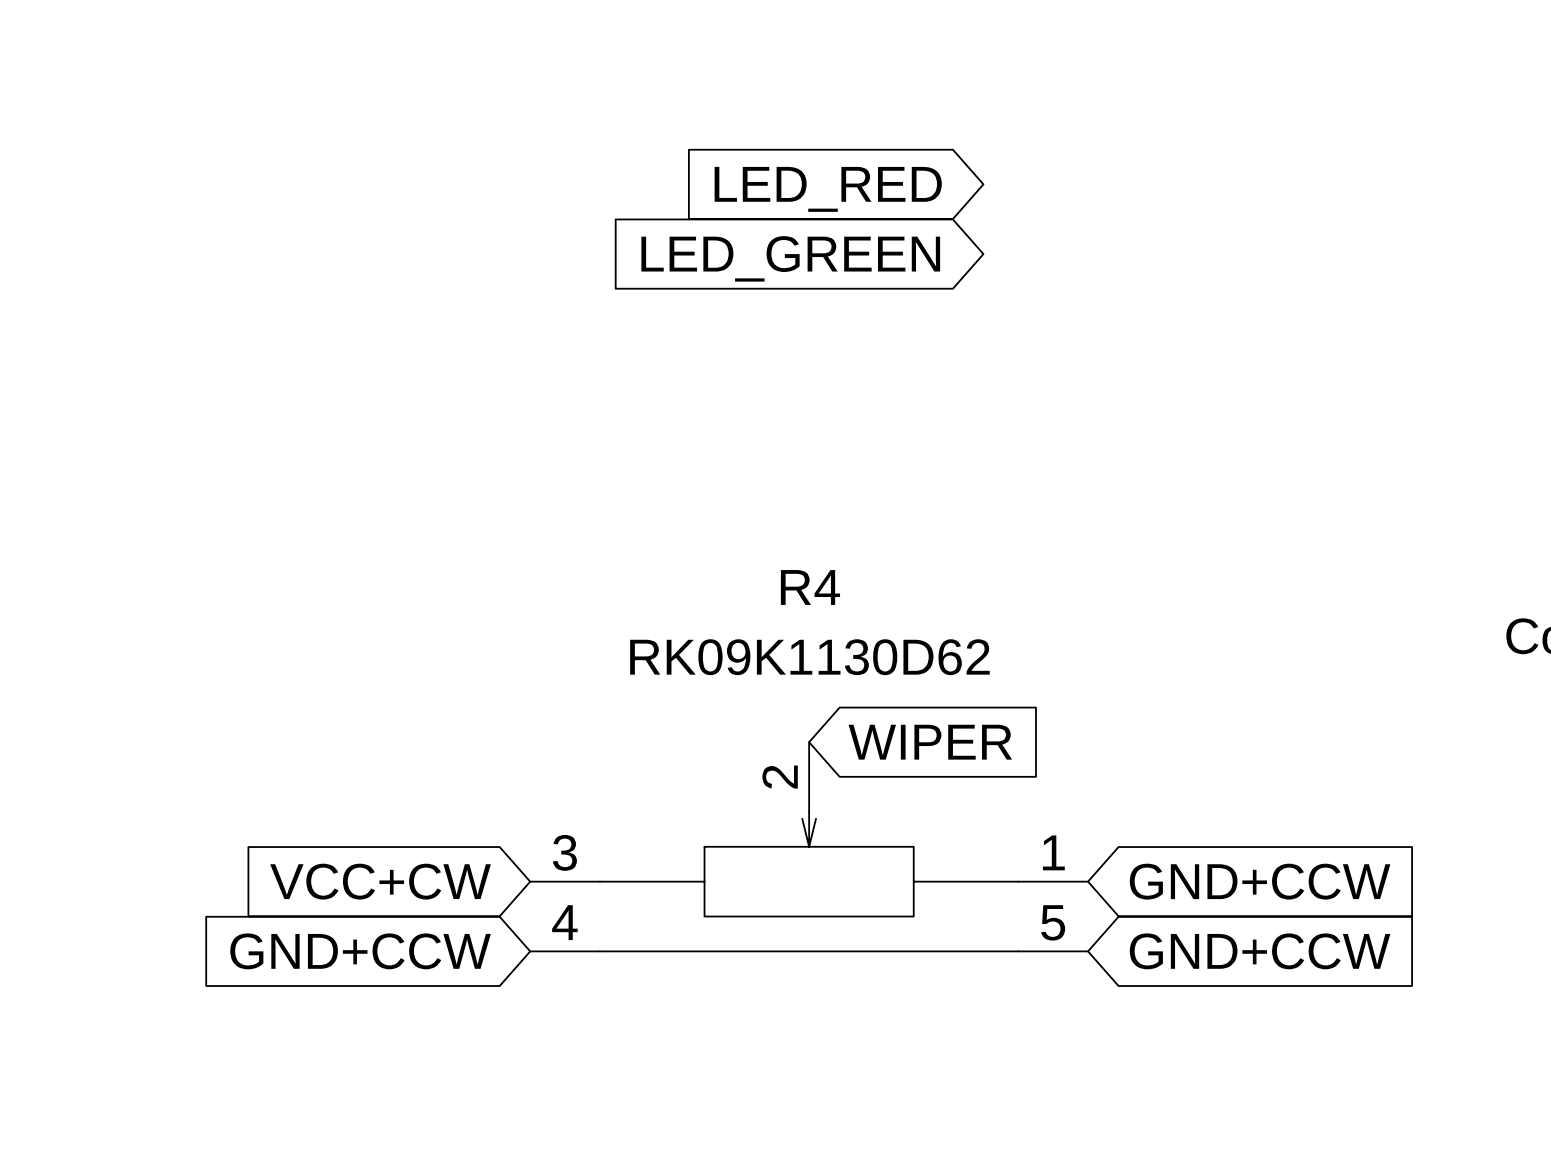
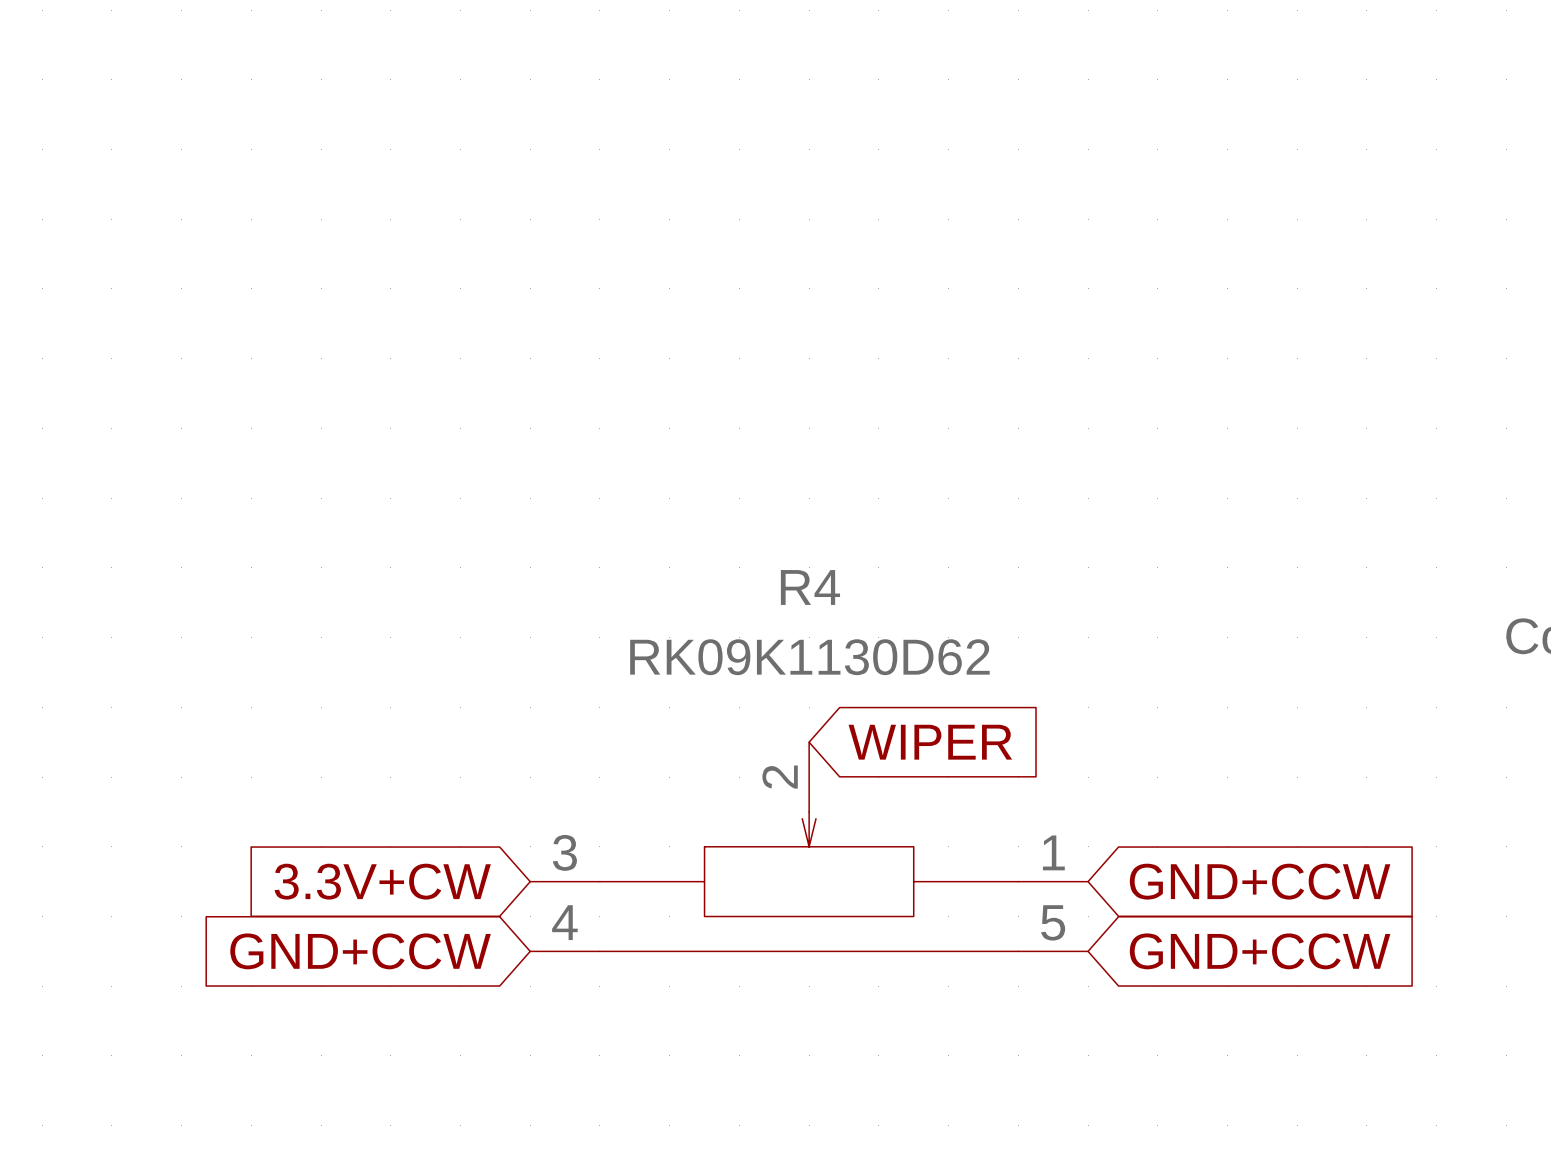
global label: LED_RED (828, 189) -> none
global label: LED_GREEN (790, 258) -> none
global label: VCC+CW (380, 881) -> 3.3V+CW (382, 881)

